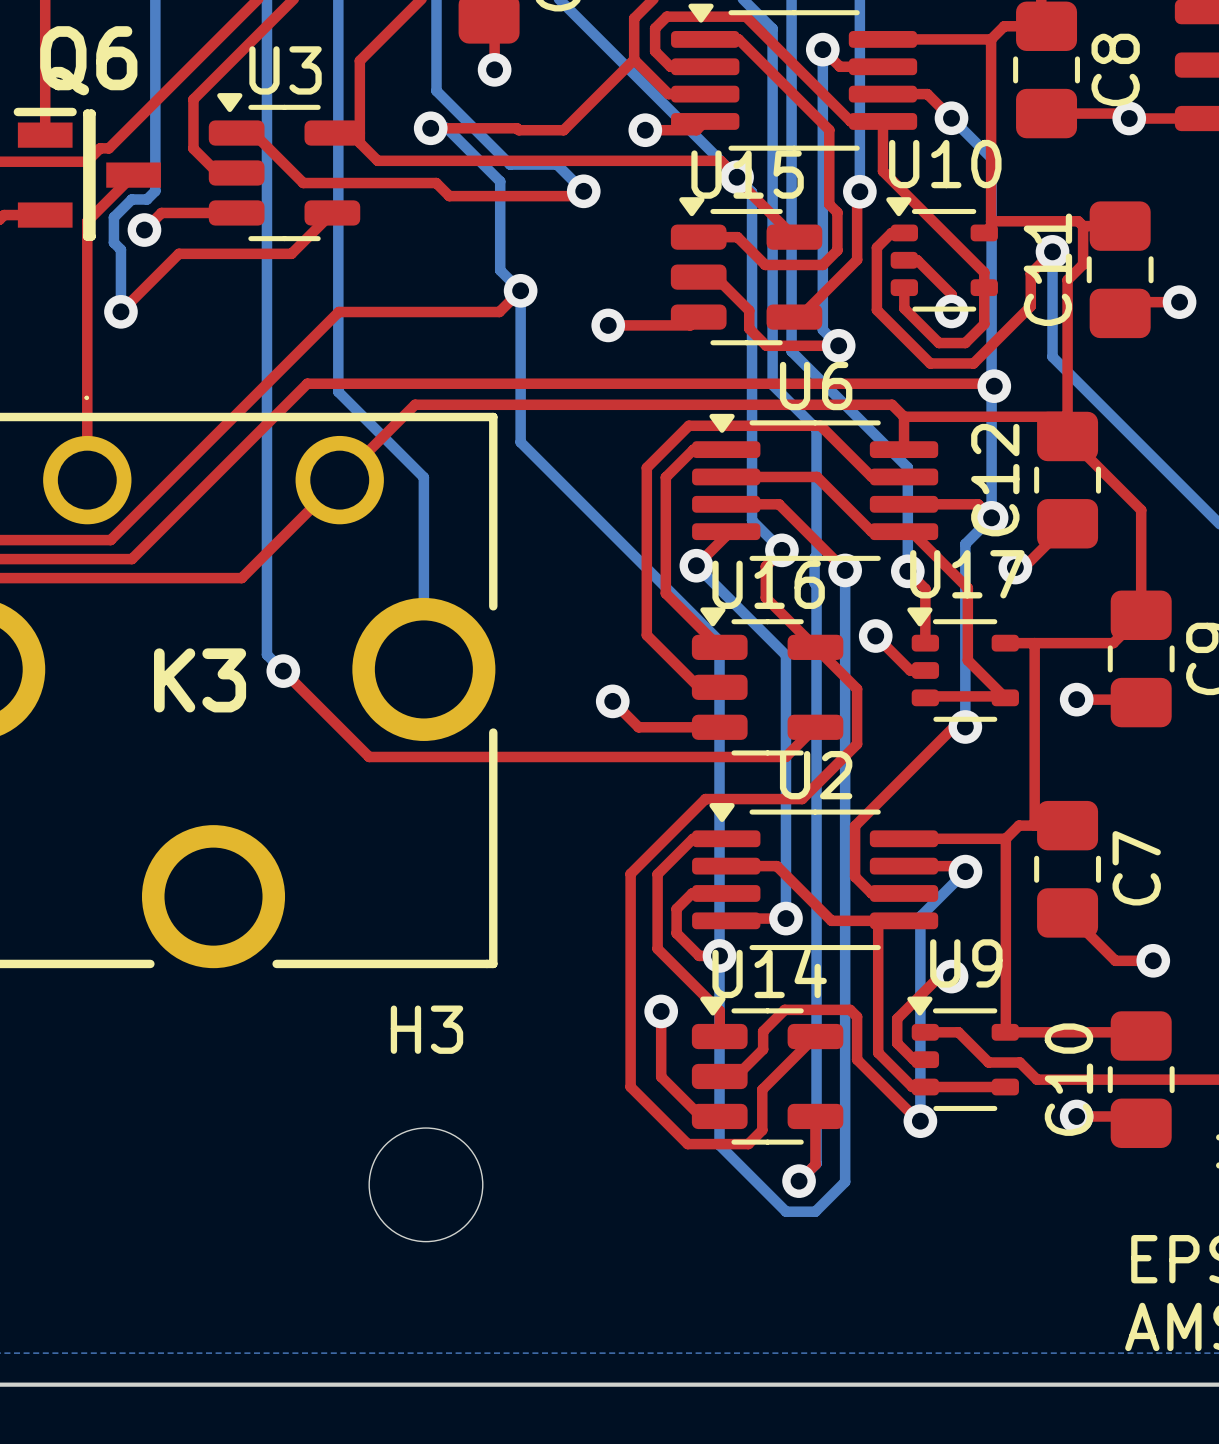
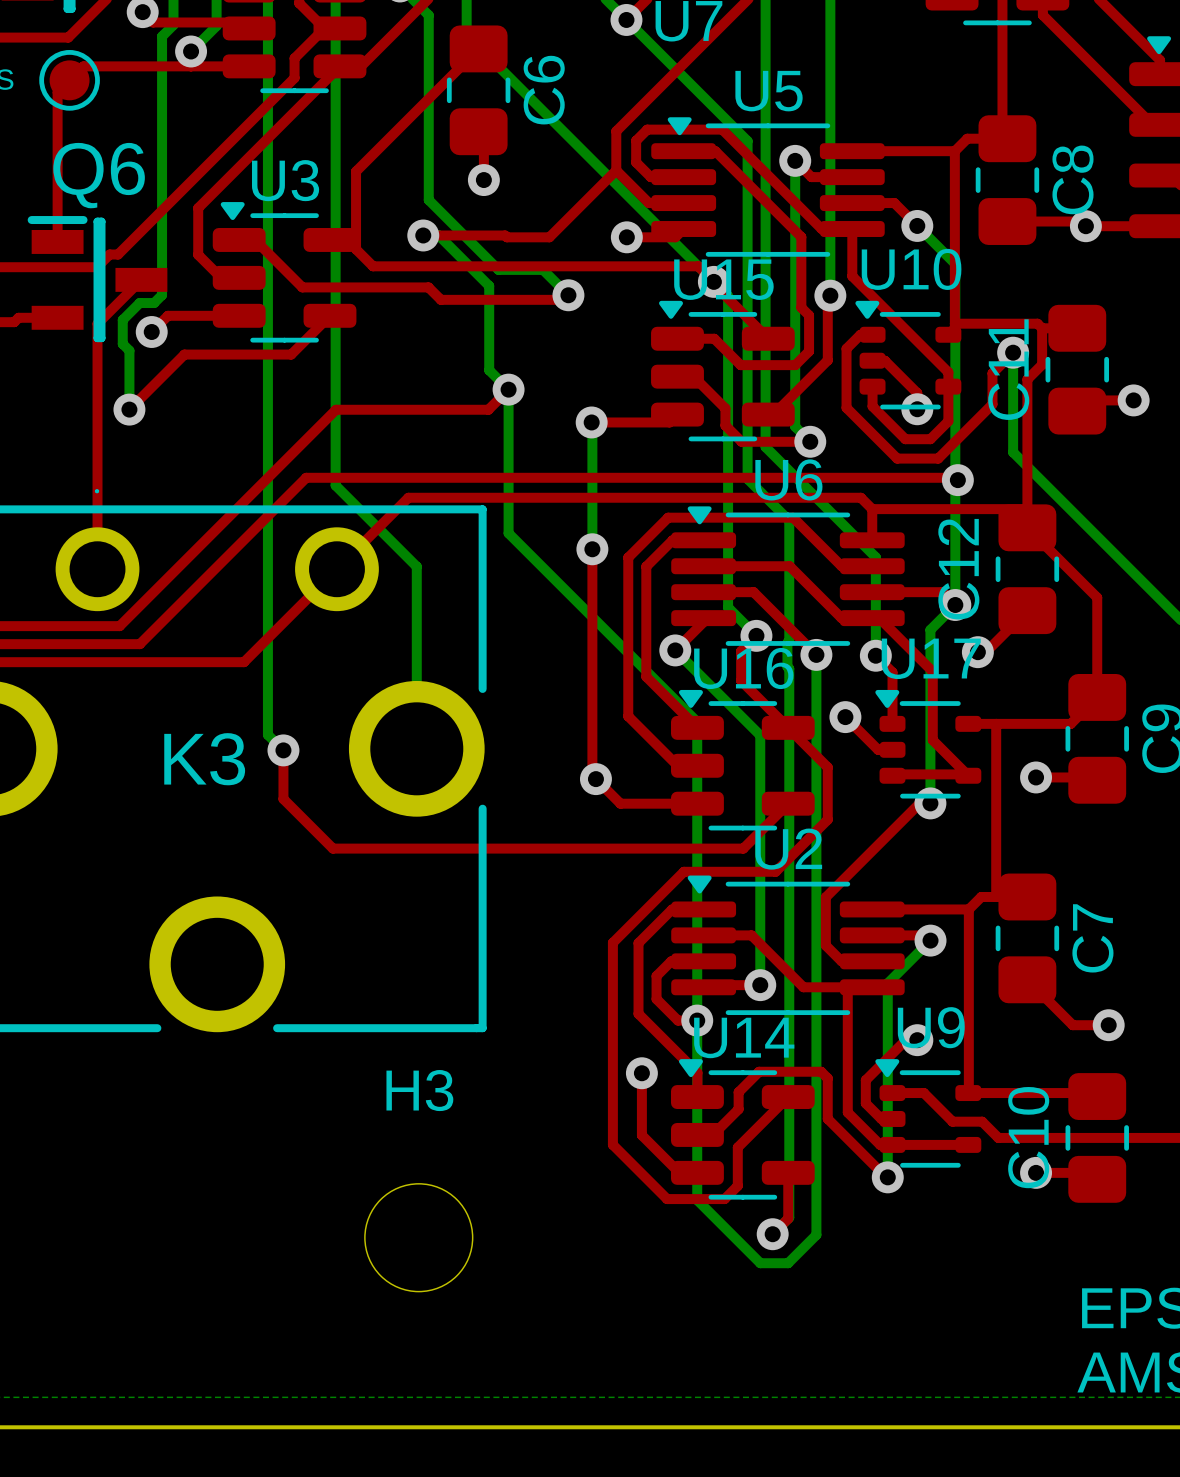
bottom track: none -> (591, 422) (592, 549)
top track: none -> (592, 549) (592, 775) (595, 779)
via: none -> (592, 549)
top track: (283, 671) (369, 756) (785, 756) -> (283, 750) (283, 799) (332, 848) (743, 848) (760, 831)

